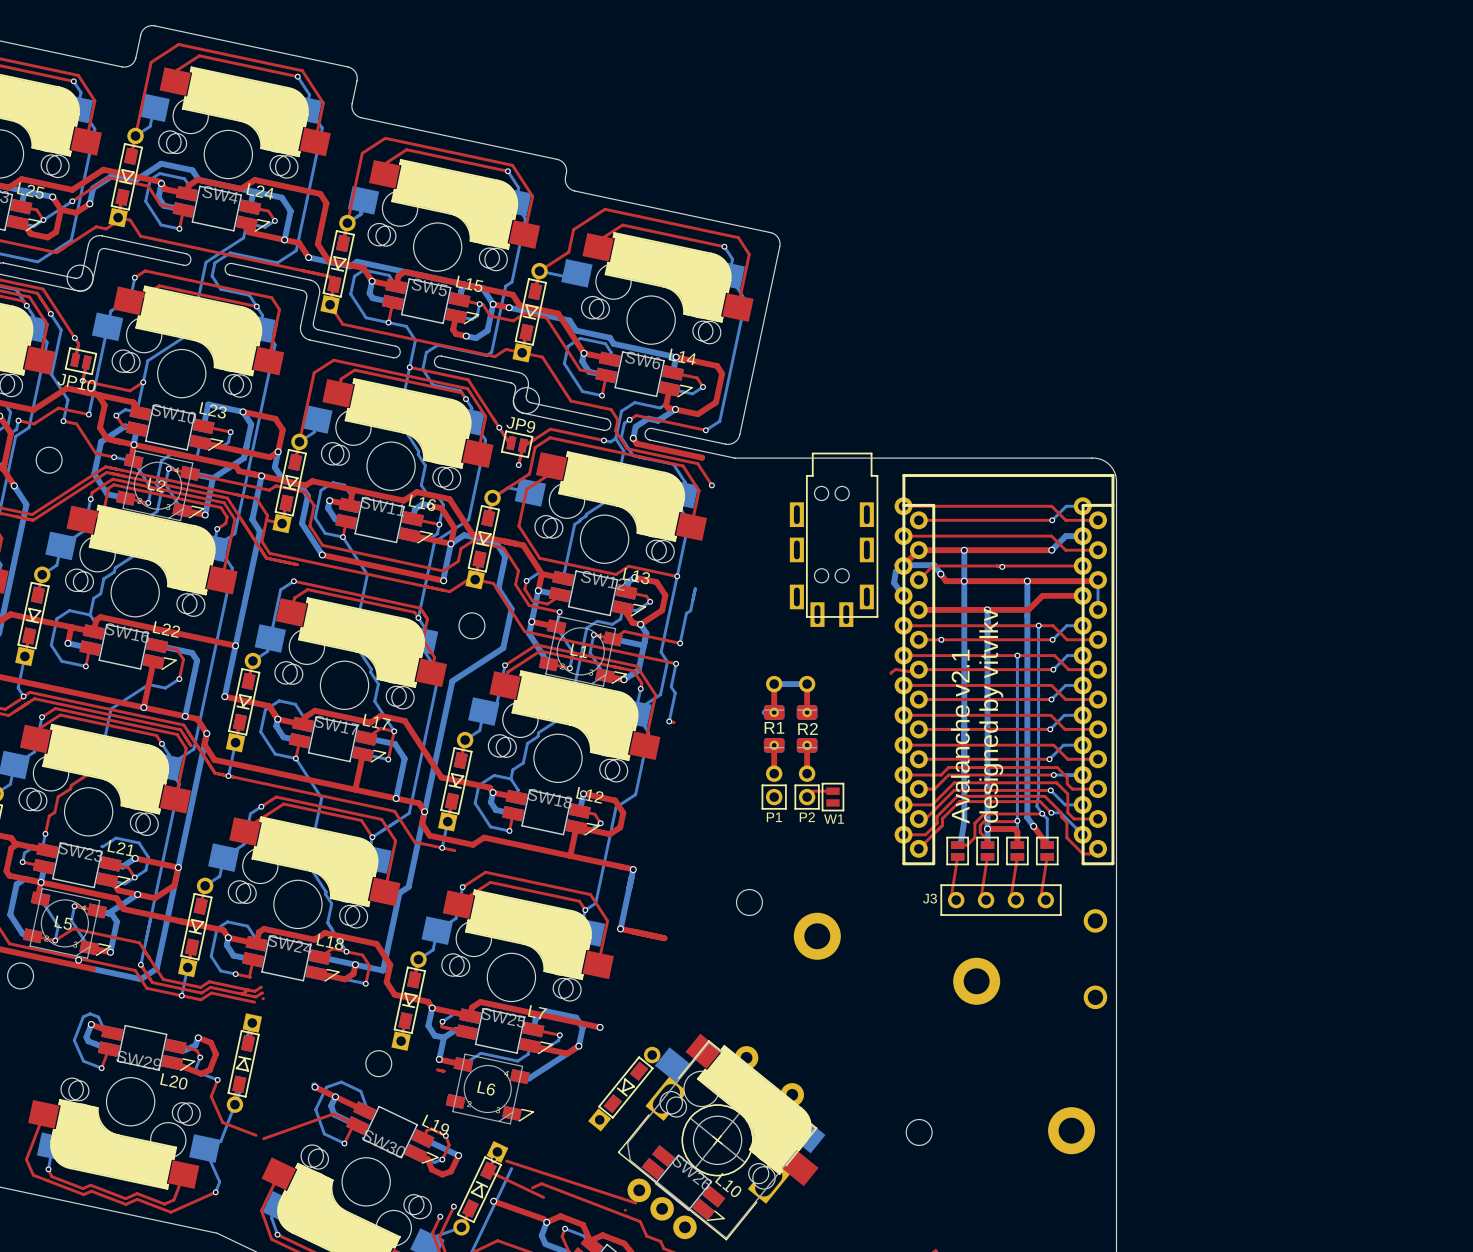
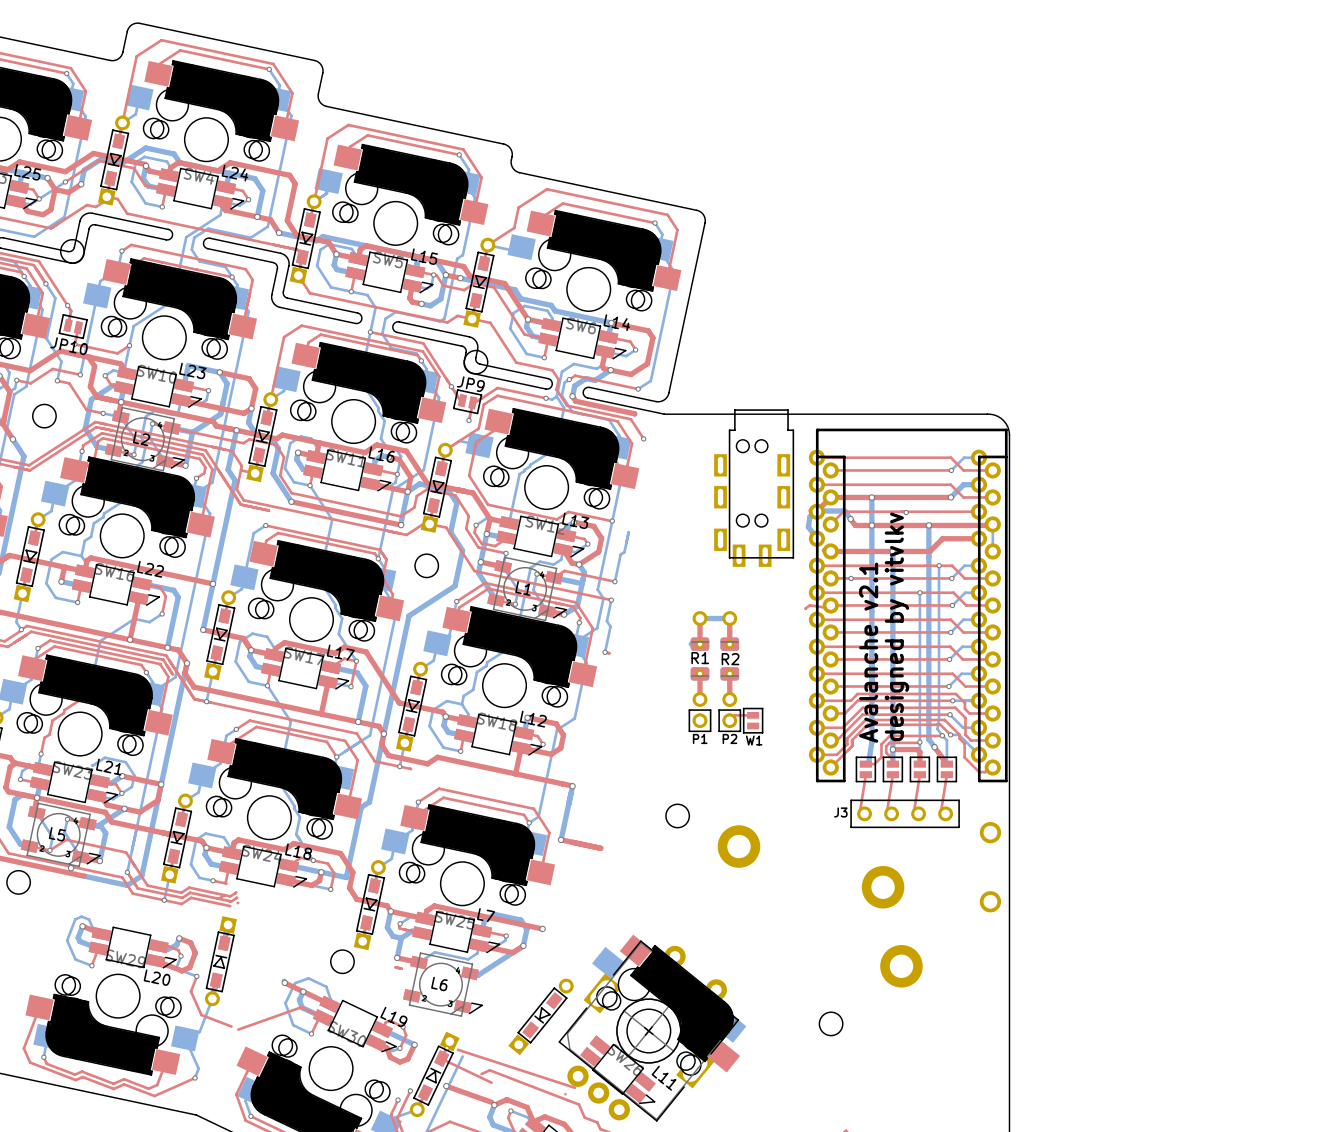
part position: (624, 1089) -> (540, 1016)
part position: (1071, 1130) -> (901, 966)
L10 name: L10 (728, 1185) -> L11 (664, 1078)

